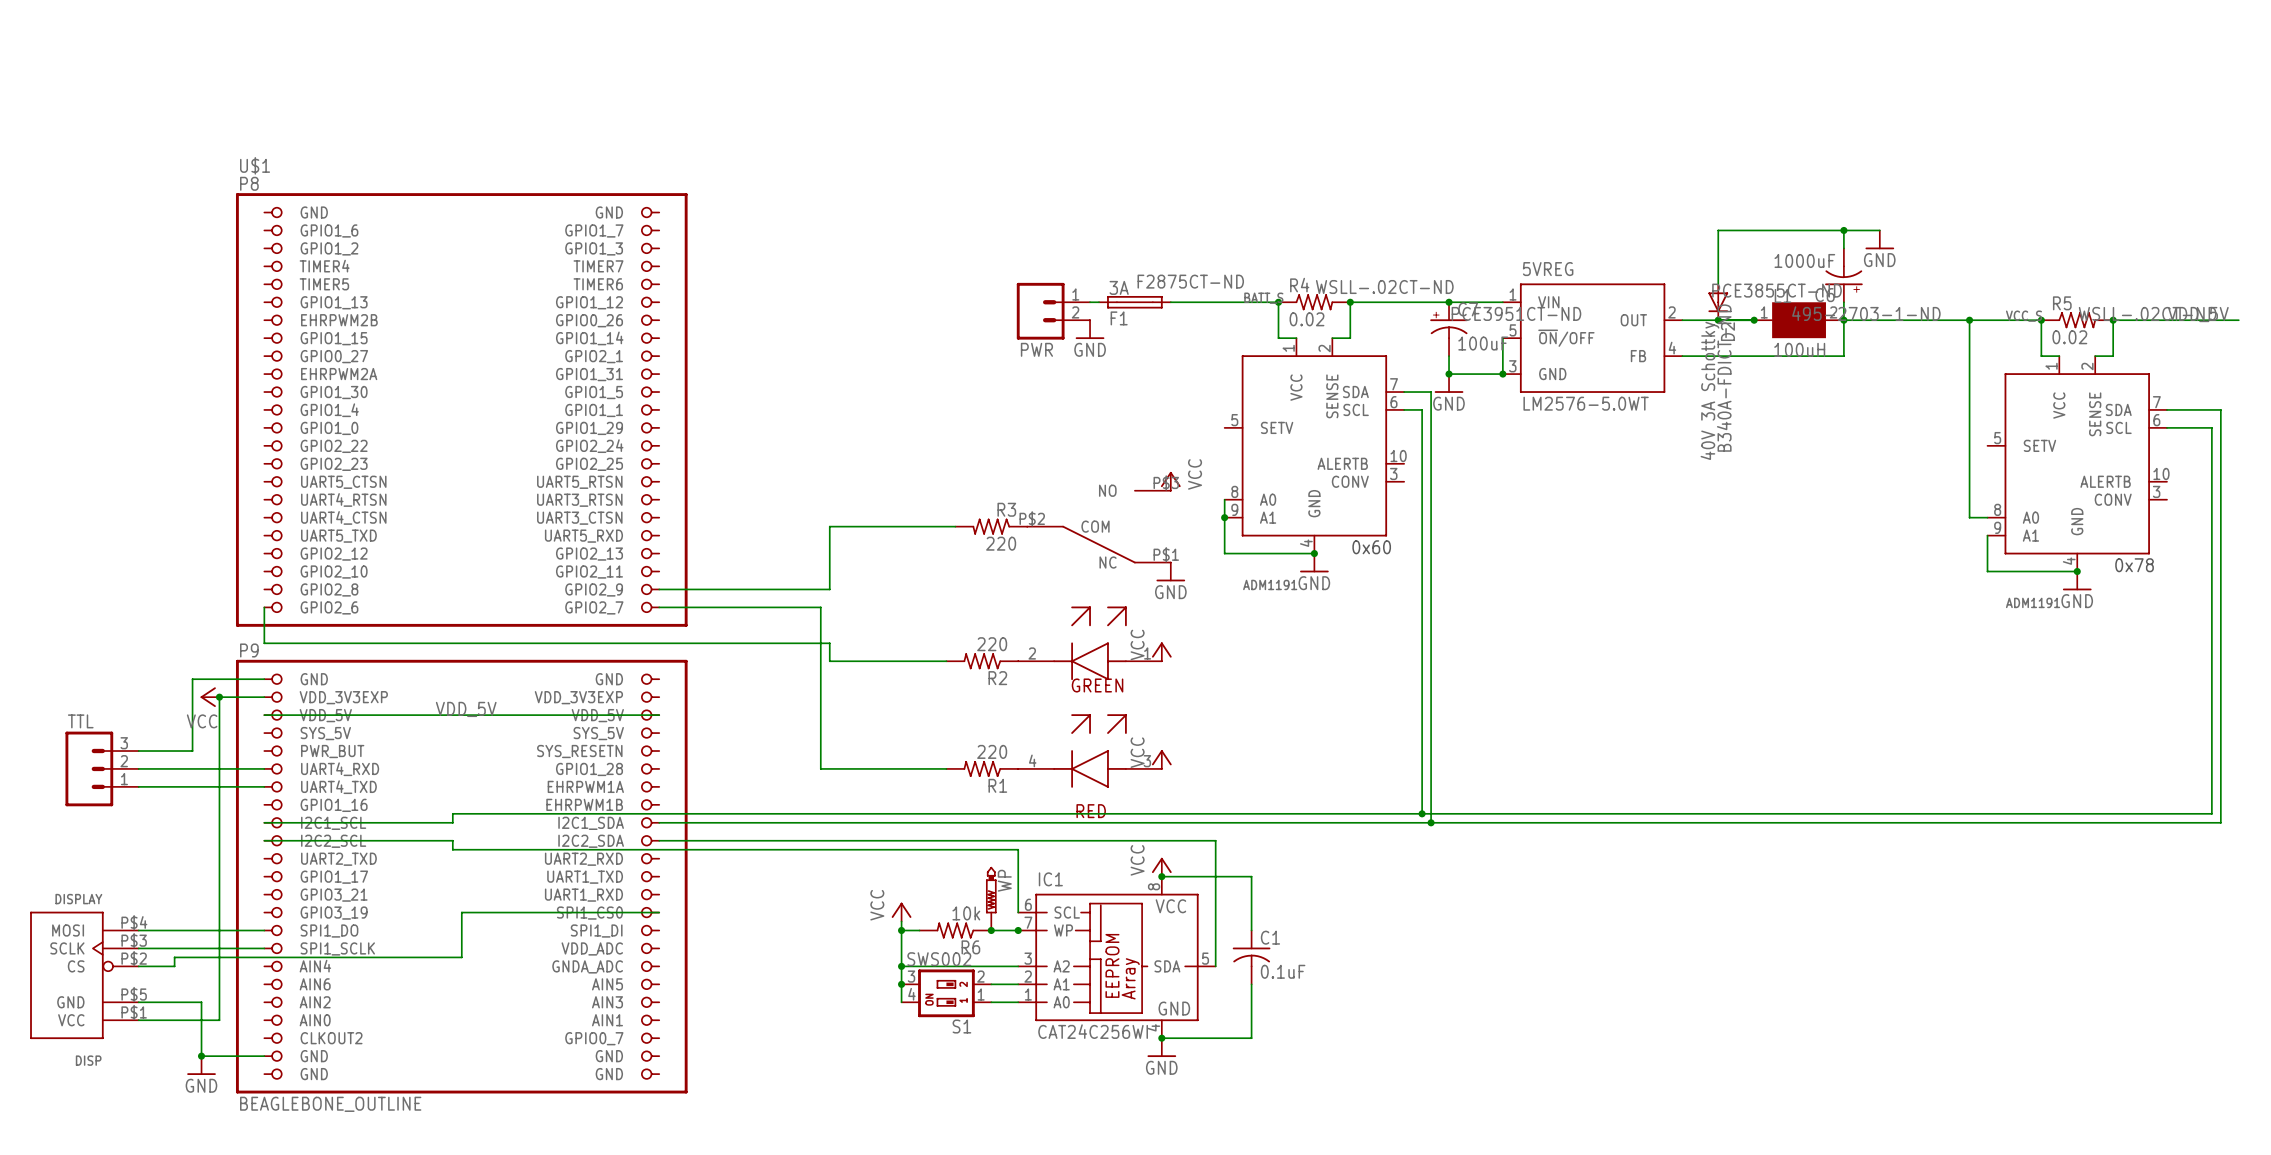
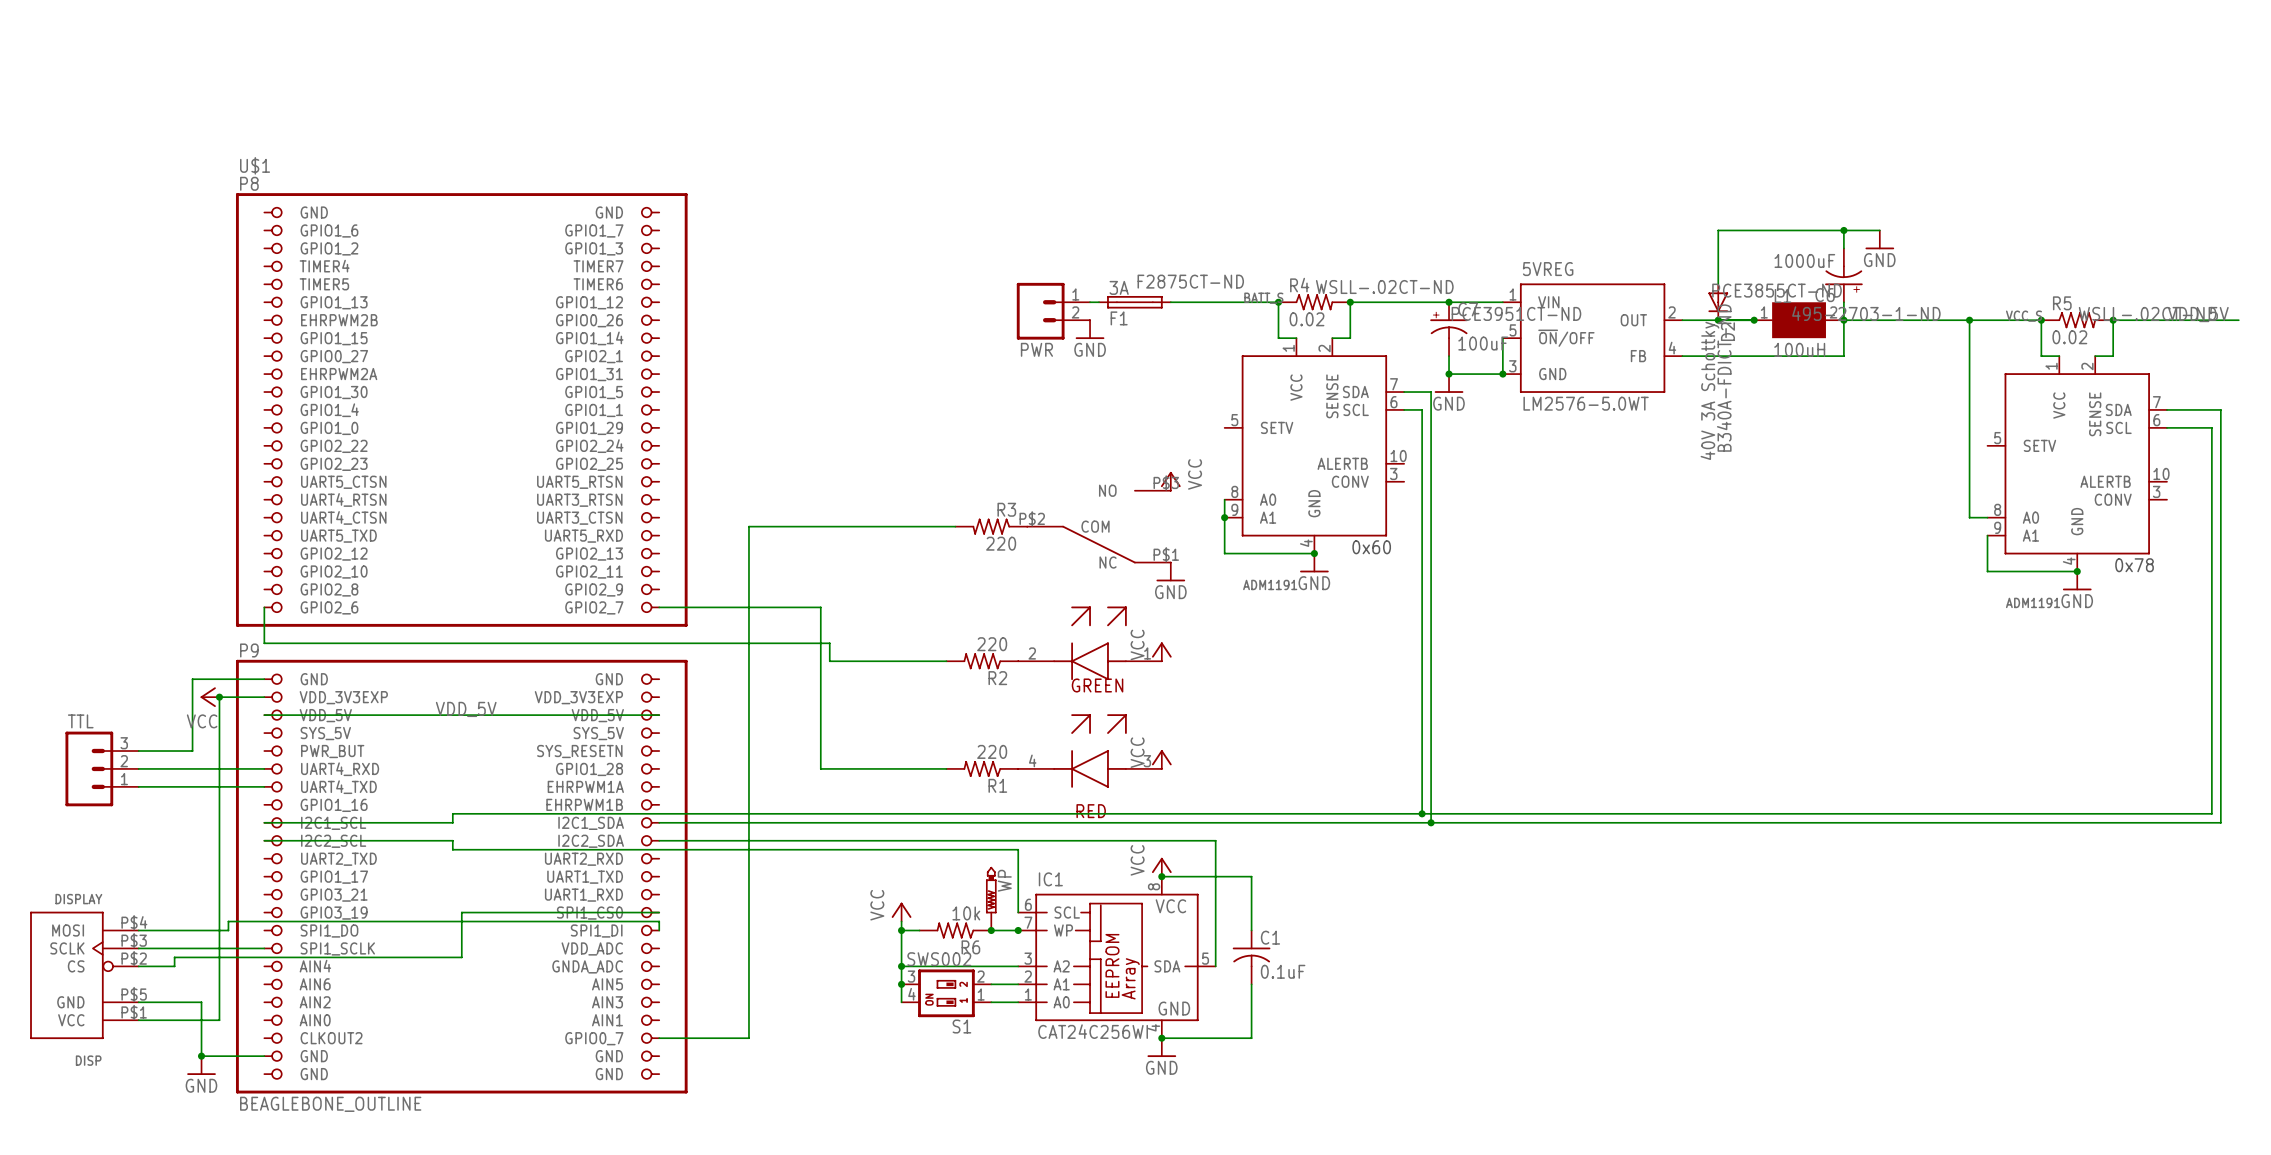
wire: (829, 526) (829, 589) (659, 589) -> (829, 526) (748, 526) (748, 1038) (659, 1038)
wire: (228, 930) (264, 930) -> (228, 930) (228, 921) (659, 921) (659, 930)

